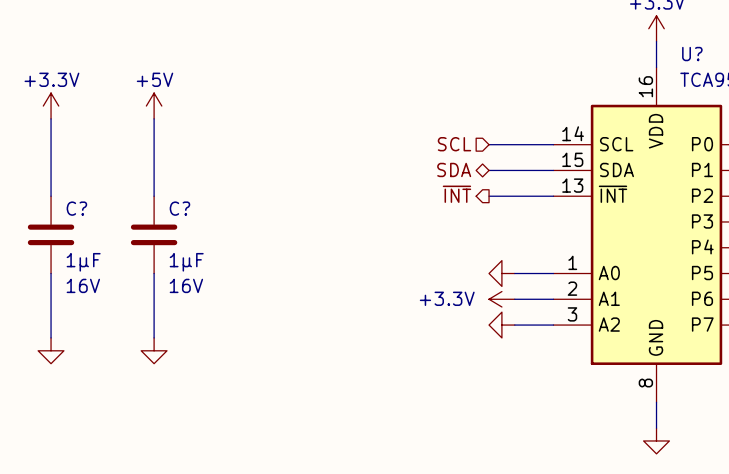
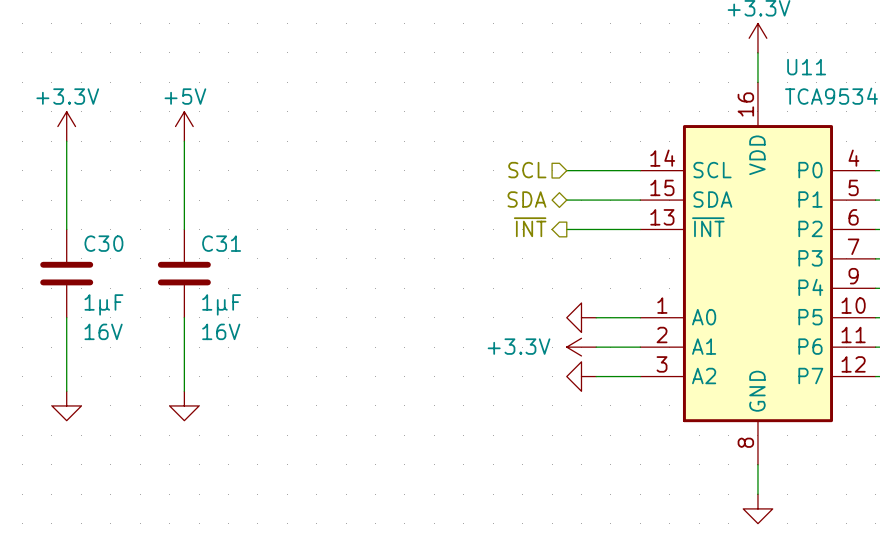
U? name: U? (692, 54) -> U11 (806, 67)
C? name: C? (76, 208) -> C30 (103, 243)
C? name: C? (179, 208) -> C31 (221, 243)

